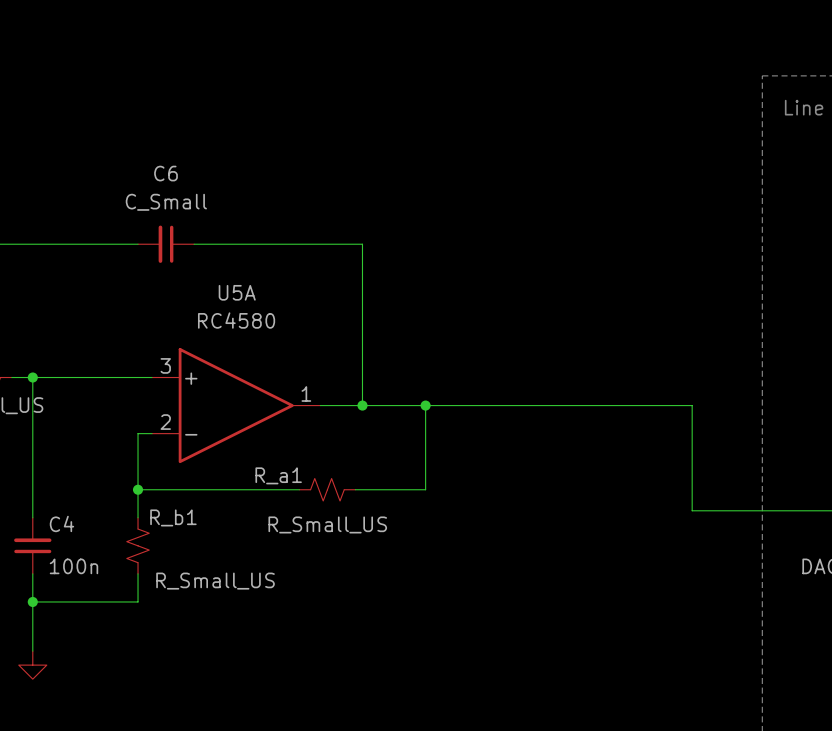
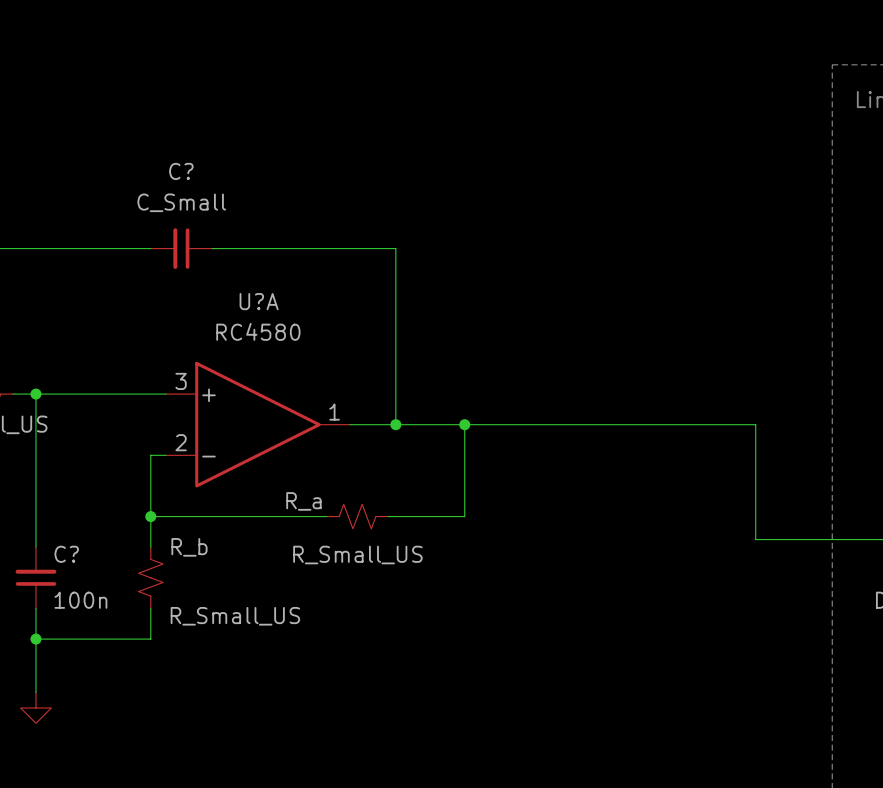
C6 name: C6 (166, 173) -> C? (181, 171)
U5A name: U5A (237, 292) -> U?A (259, 301)
R_a1 name: R_a1 (278, 475) -> R_a (303, 501)
R_b1 name: R_b1 (173, 517) -> R_b (189, 547)
C4 name: C4 (61, 523) -> C? (66, 554)

